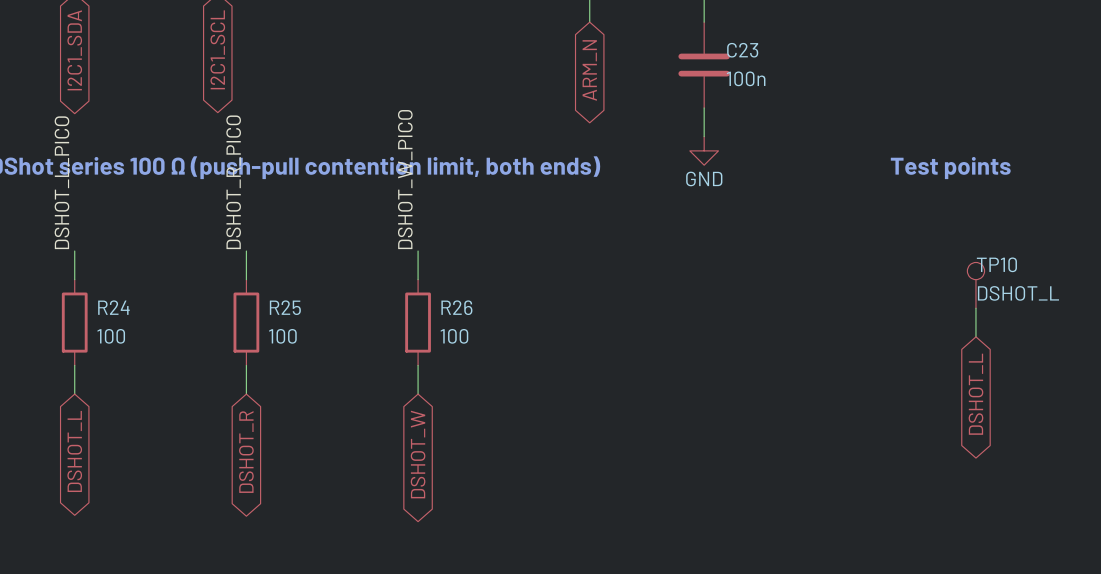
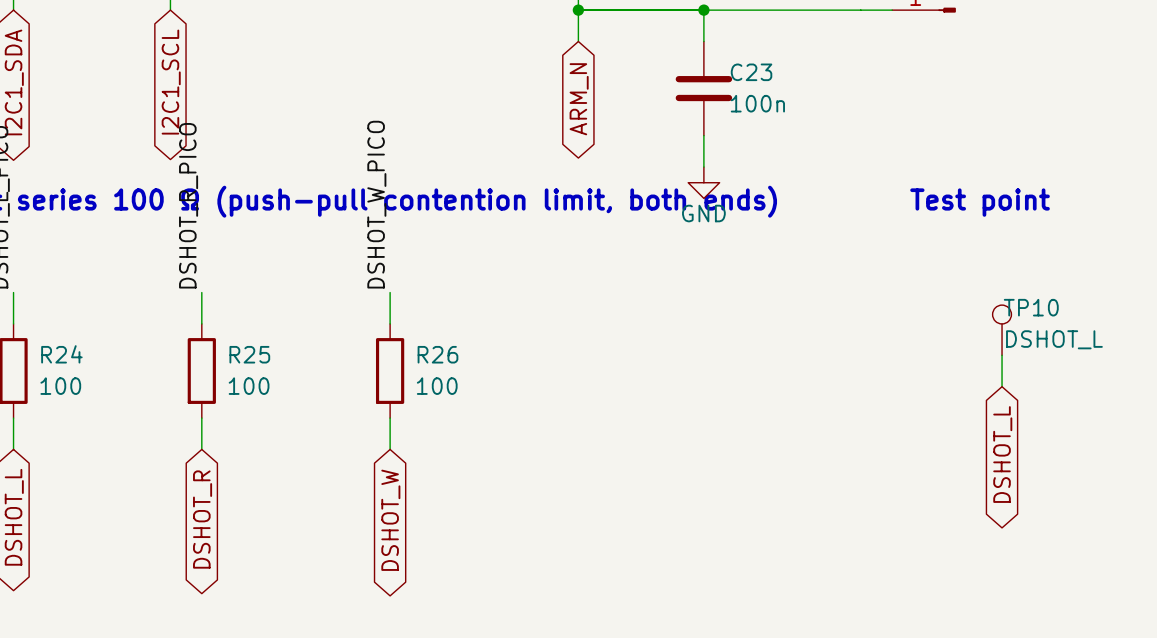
text: Test points (950, 168) -> Test point (980, 202)

